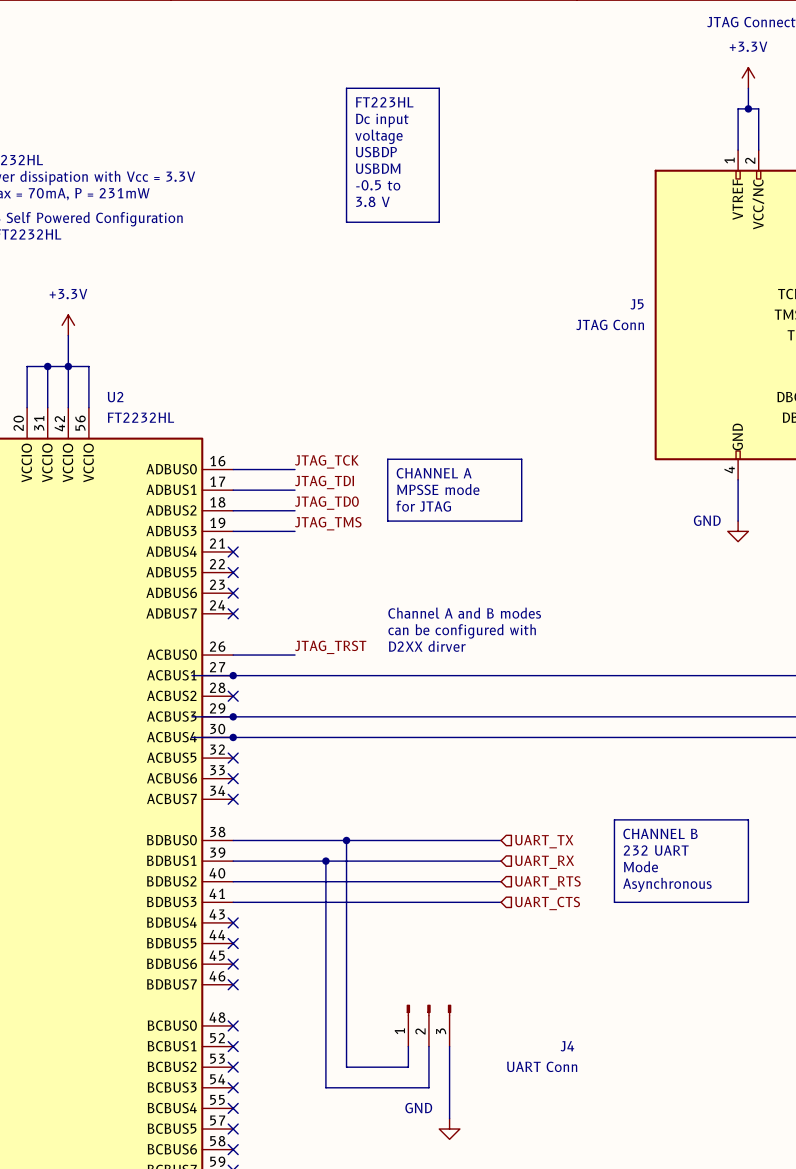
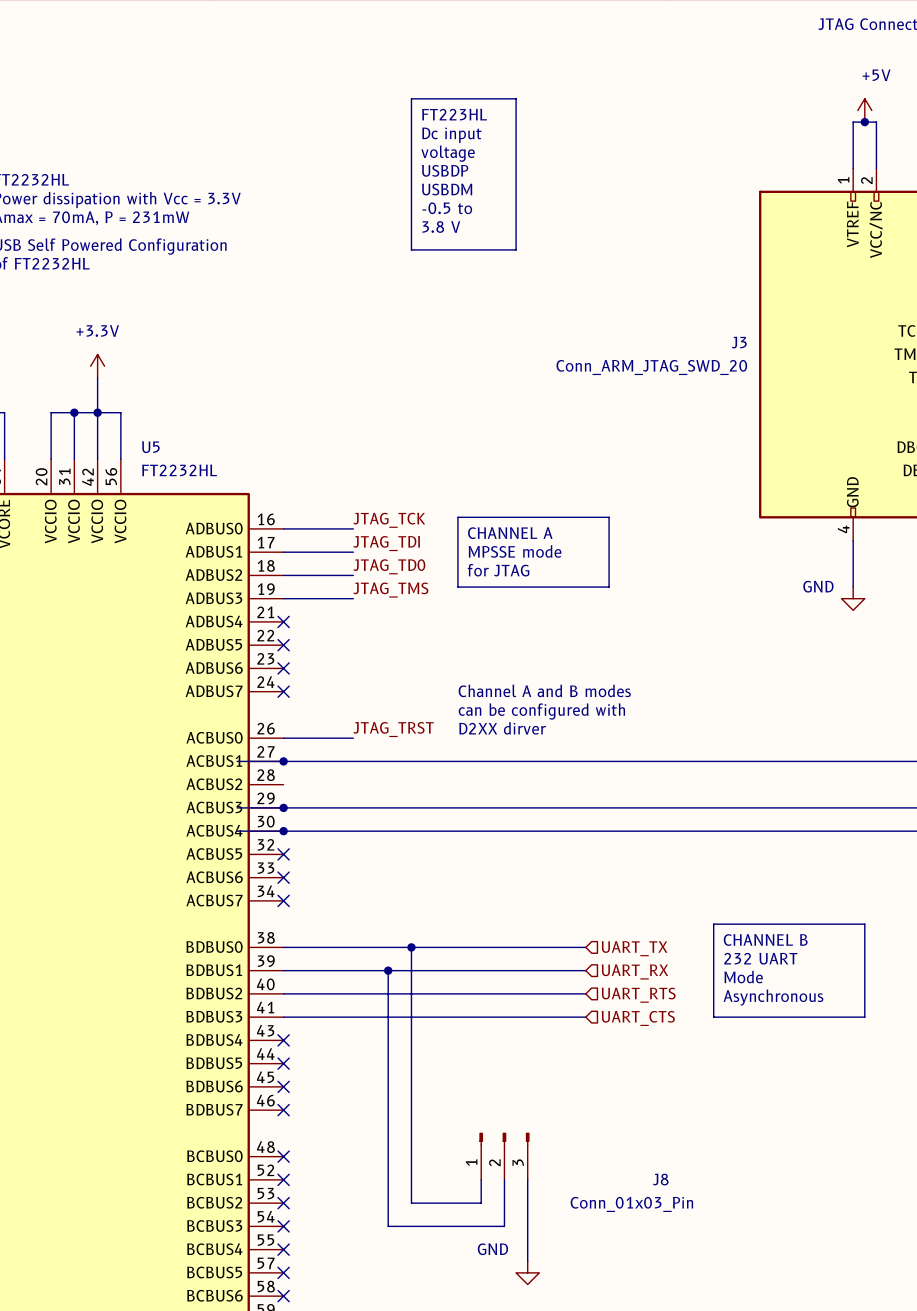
power symbol: +3.3V (748, 77) -> none
power symbol: none -> +5V (864, 110)
J5 name: J5 (637, 304) -> J3 (739, 342)
J5 value: JTAG Conn (610, 324) -> Conn_ARM_JTAG_SWD_20 (651, 367)
U2 name: U2 (115, 397) -> U5 (150, 447)
no-connect mark: (233, 696) -> none
J4 name: J4 (567, 1046) -> J8 (660, 1179)
J4 value: UART Conn (542, 1066) -> Conn_01x03_Pin (631, 1204)

